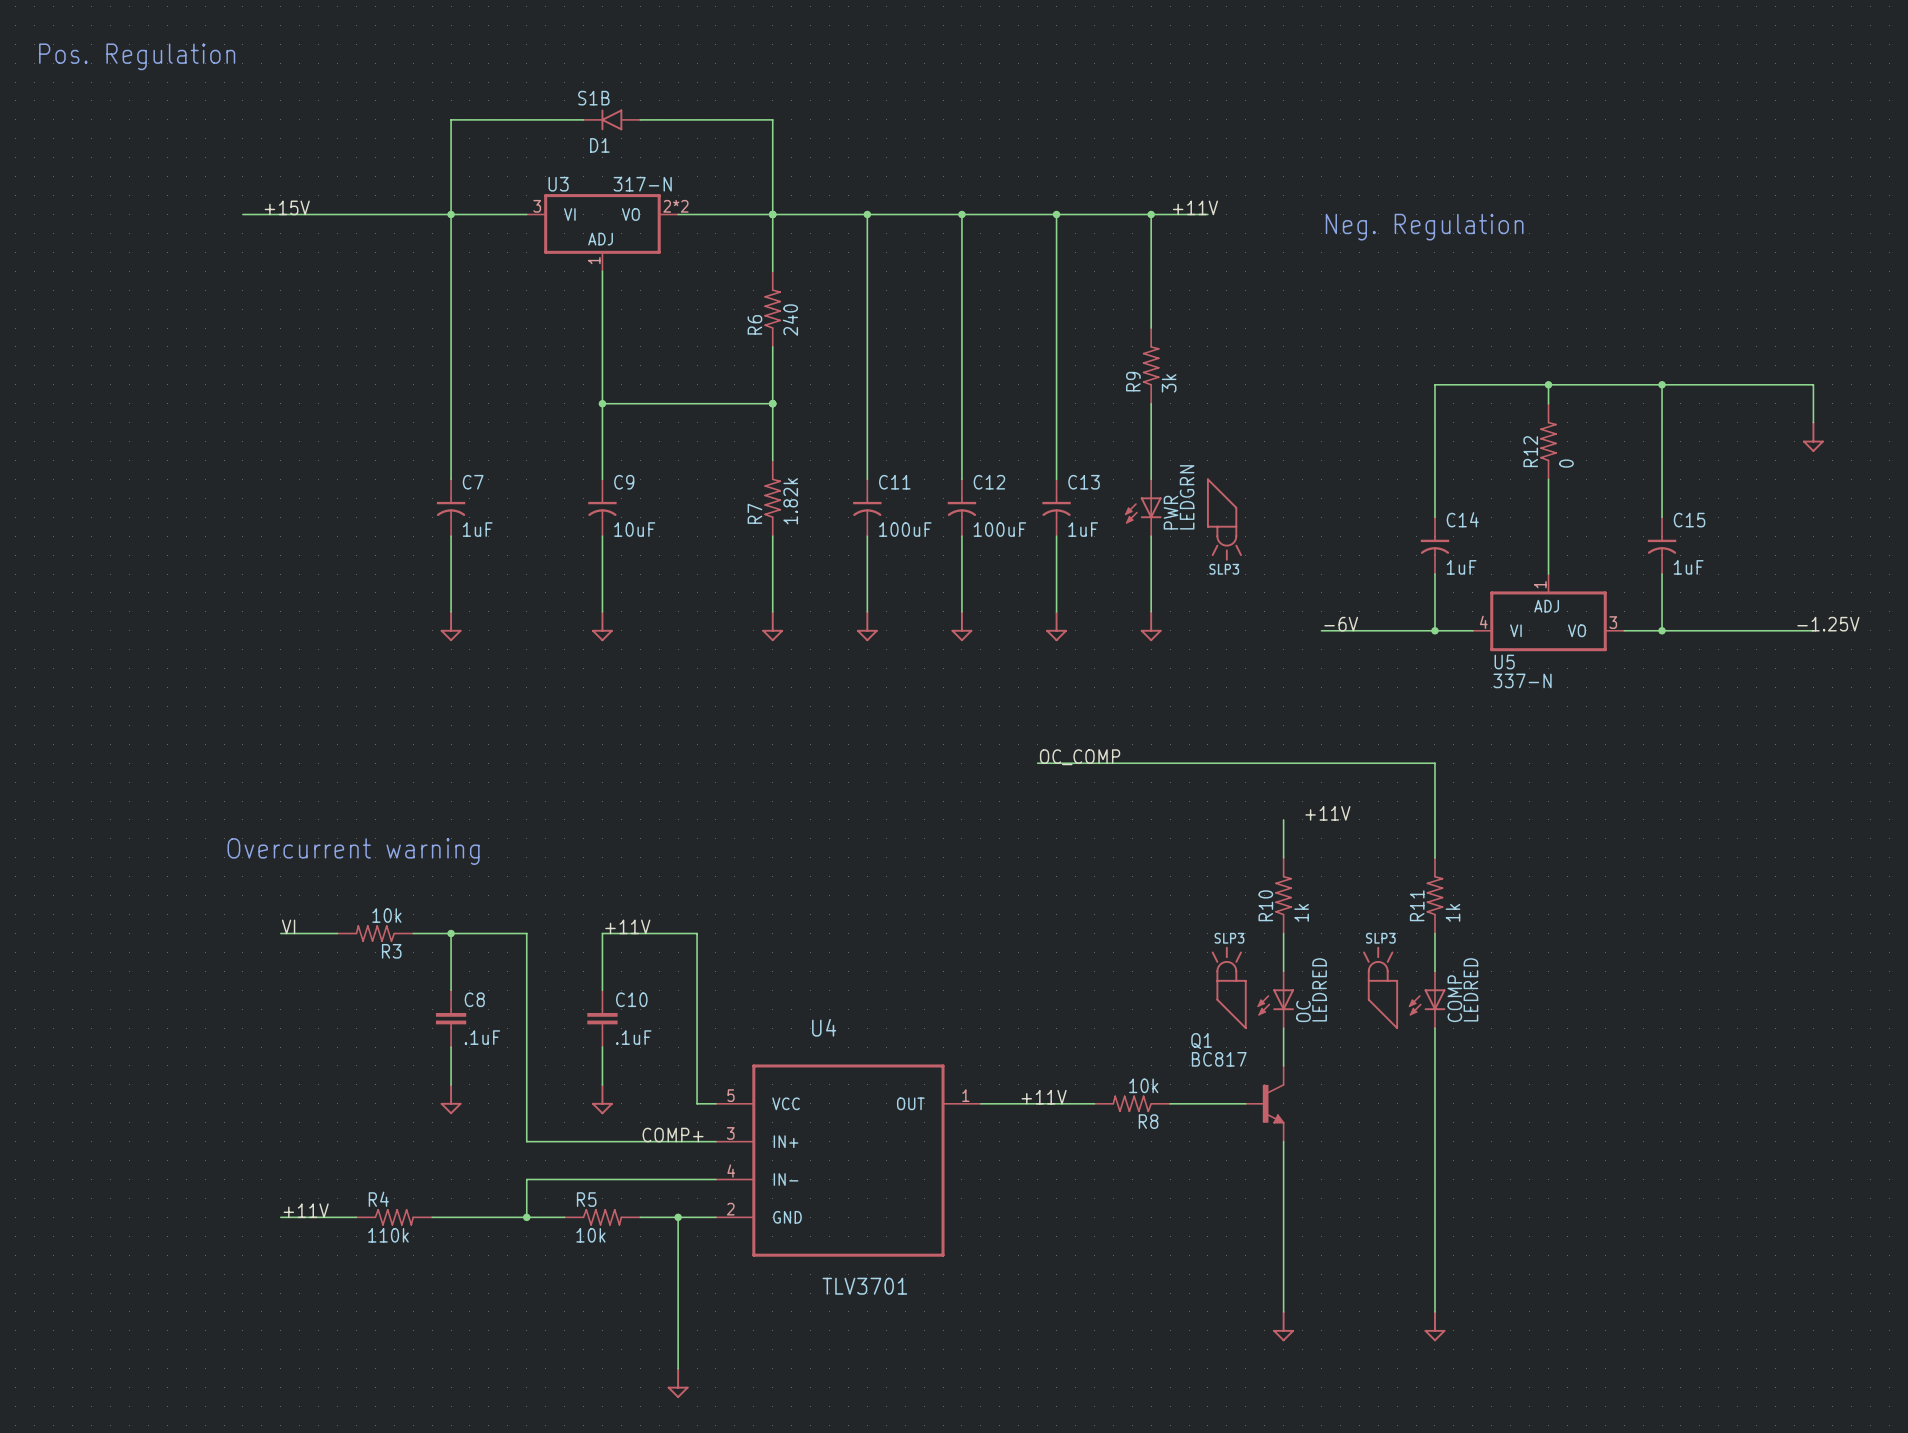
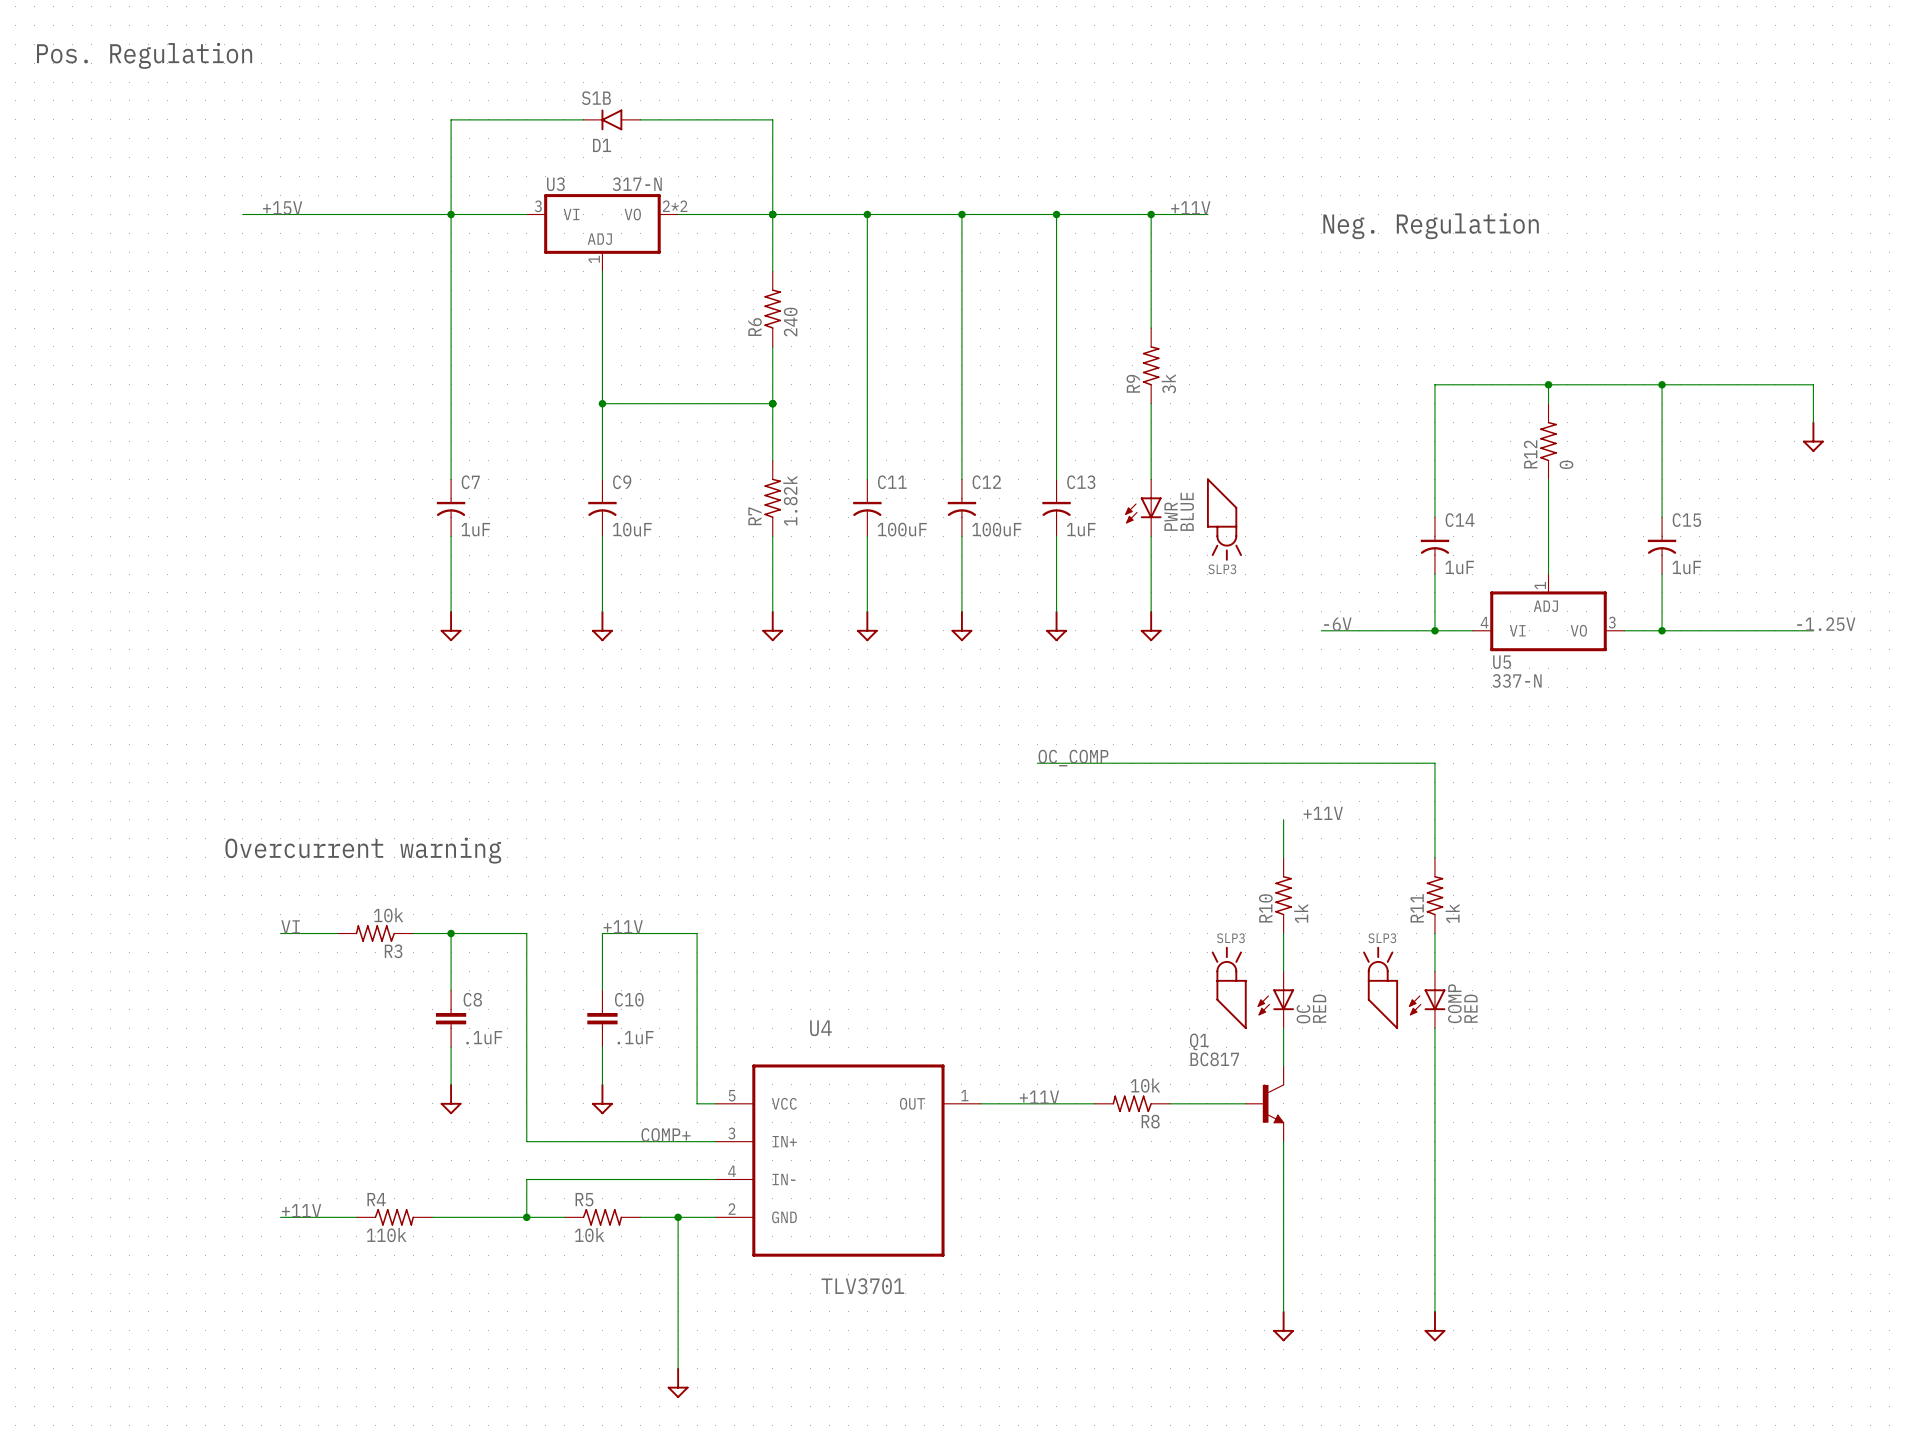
PWR value: LEDGRN (1187, 497) -> BLUE (1187, 511)
OC value: LEDRED (1319, 989) -> RED (1319, 1008)
COMP value: LEDRED (1470, 989) -> RED (1470, 1008)

